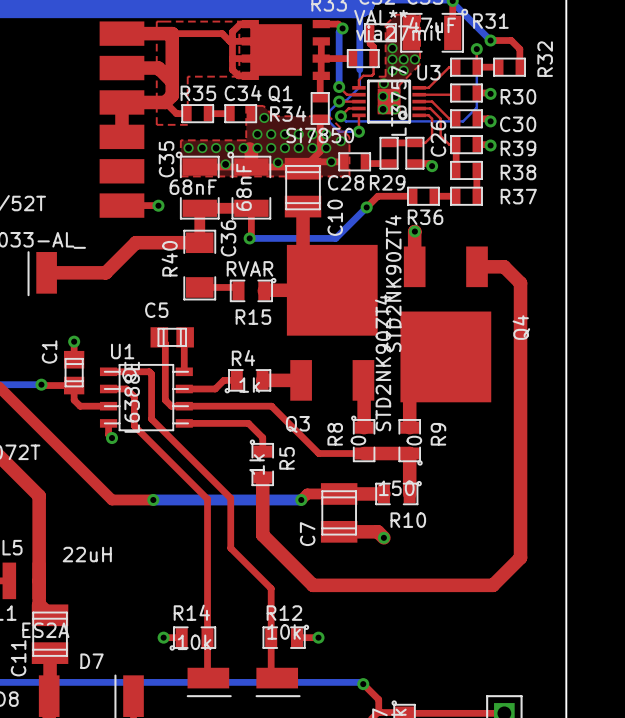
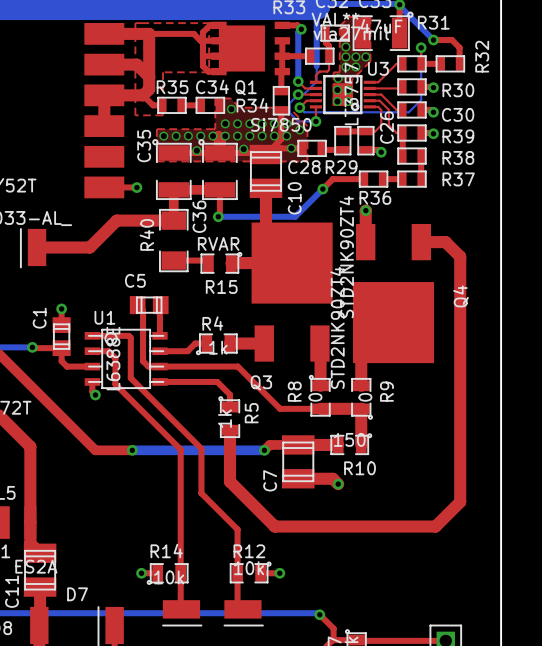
C35 value: 68nF (193, 187) -> none
C36 value: 68nF (244, 187) -> none
L5 value: 22uH (87, 554) -> none

